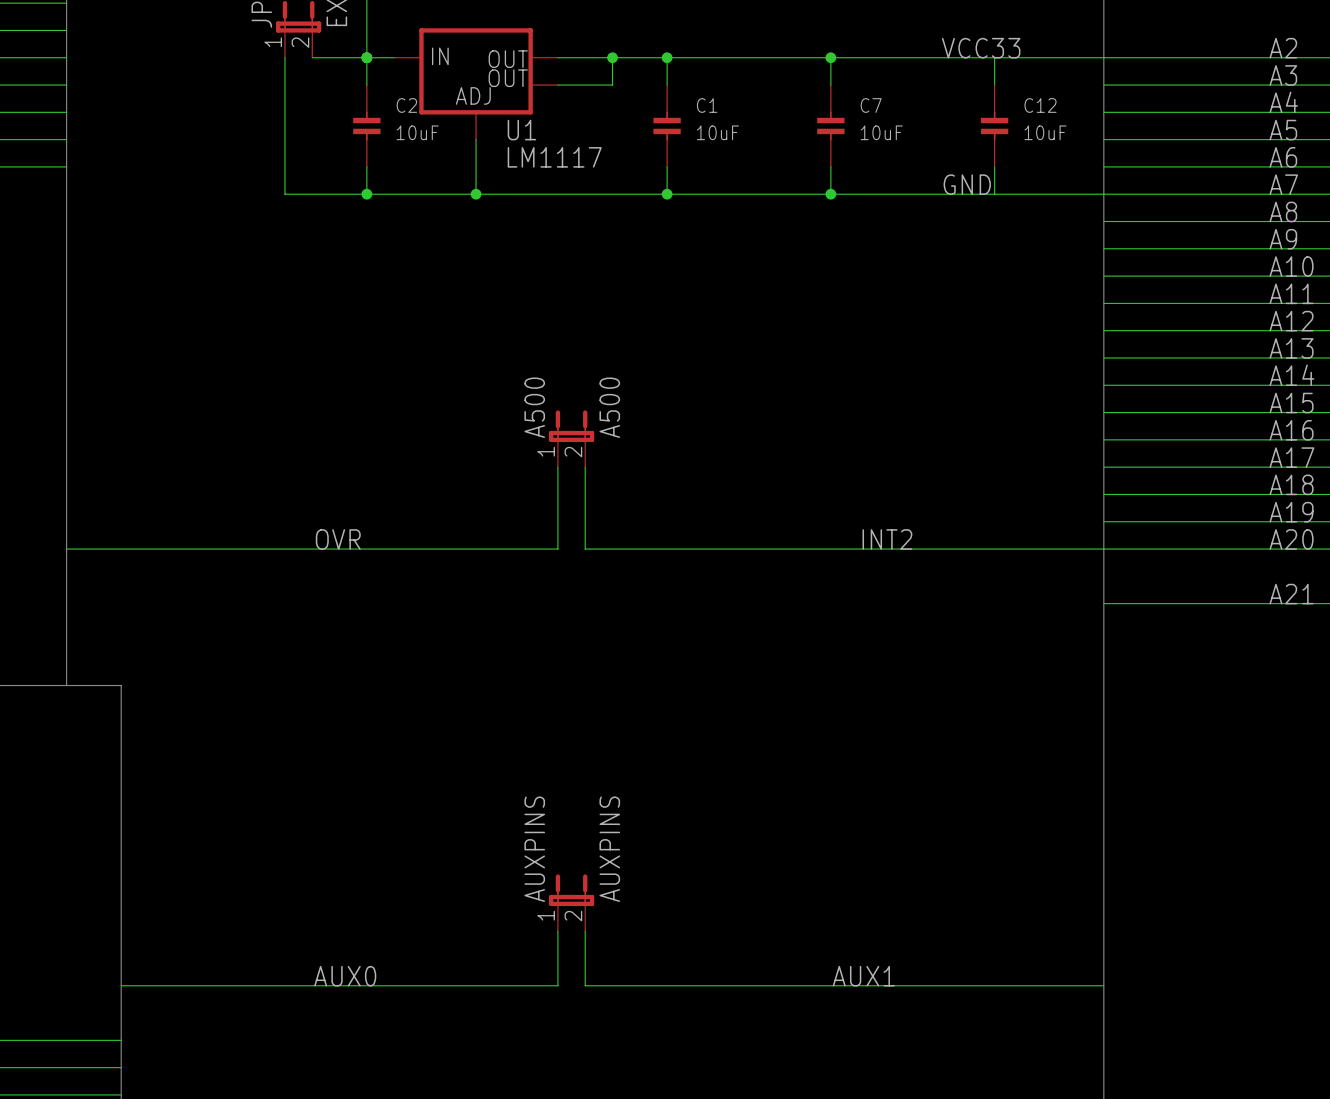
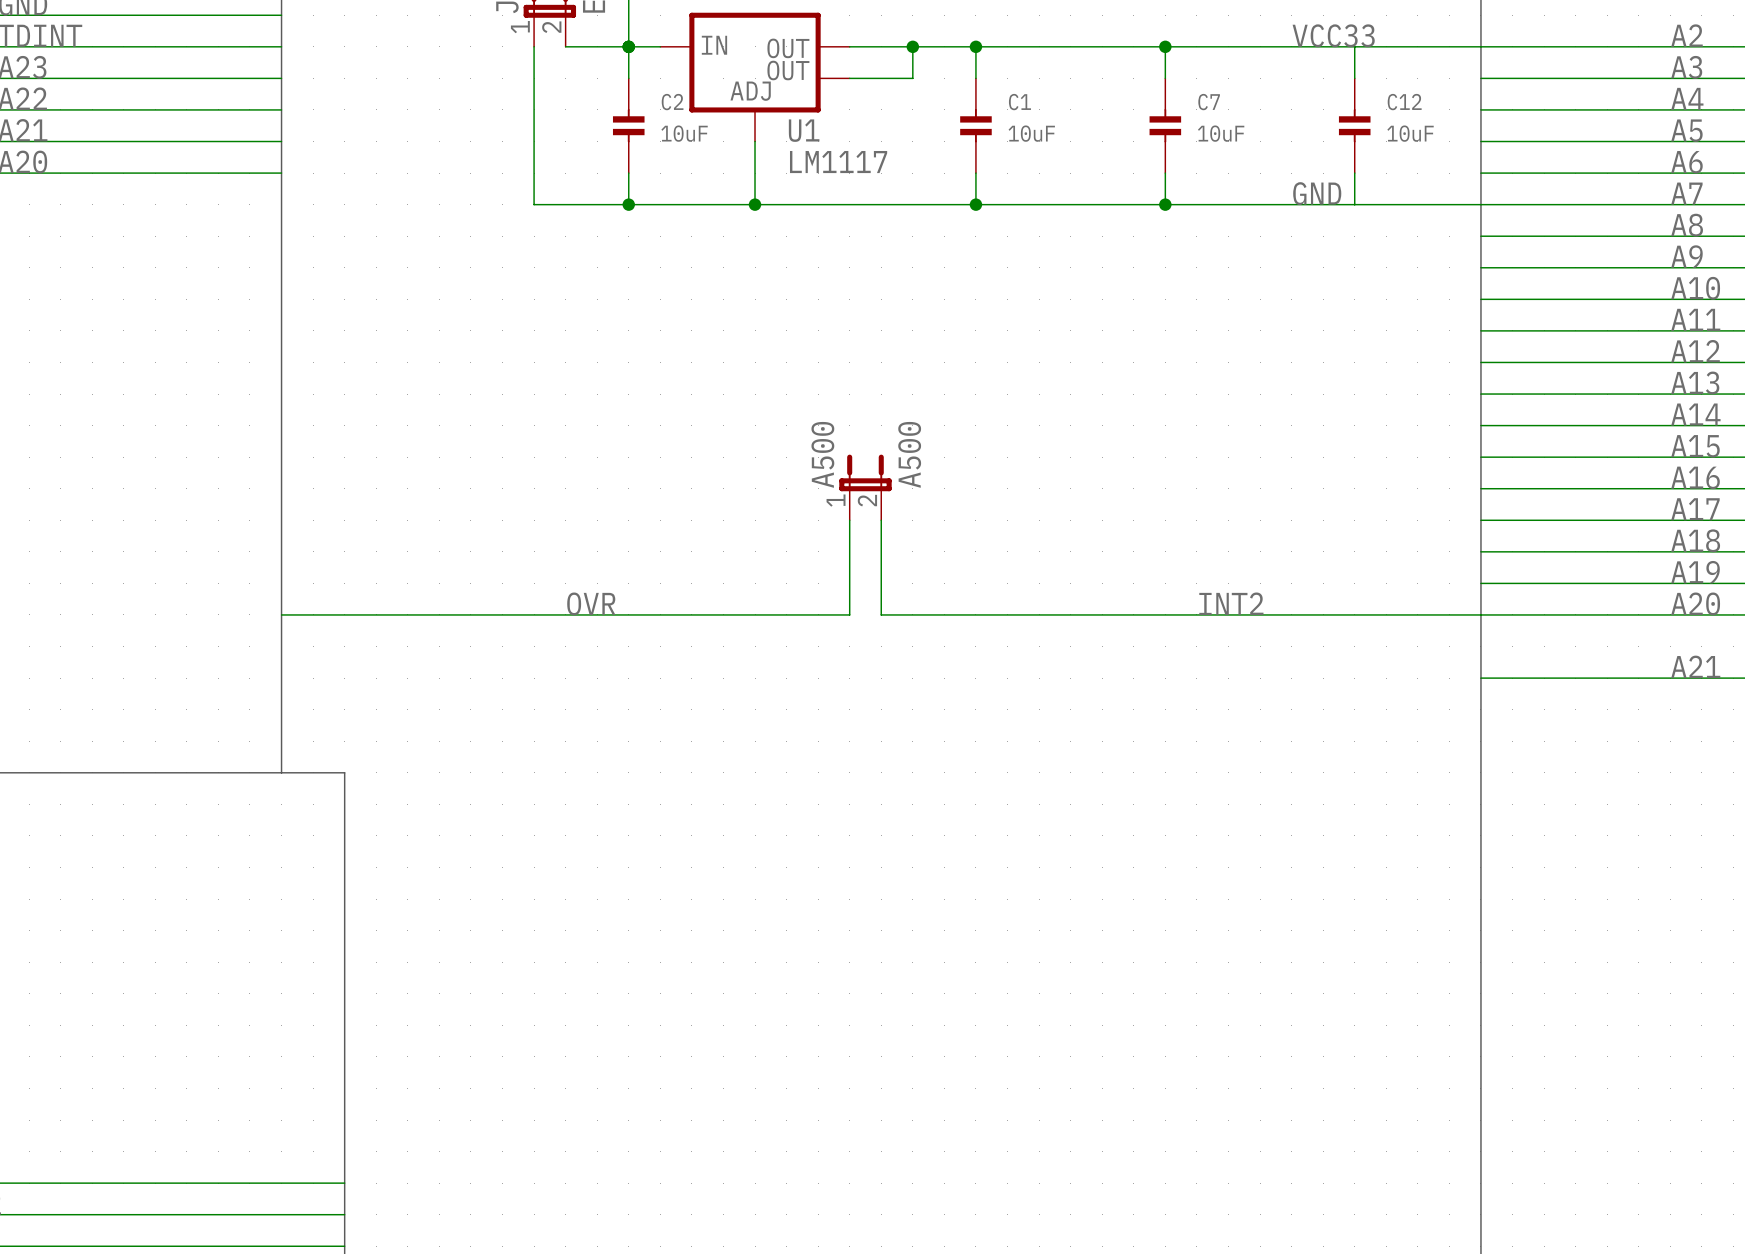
AUXPINS: AUXPINS (571, 902) -> none
wire: (557, 931) (557, 985) (121, 985) -> none
wire: (585, 931) (585, 985) (1103, 985) -> none
label: AUX0 (345, 976) -> none
label: AUX1 (863, 976) -> none

